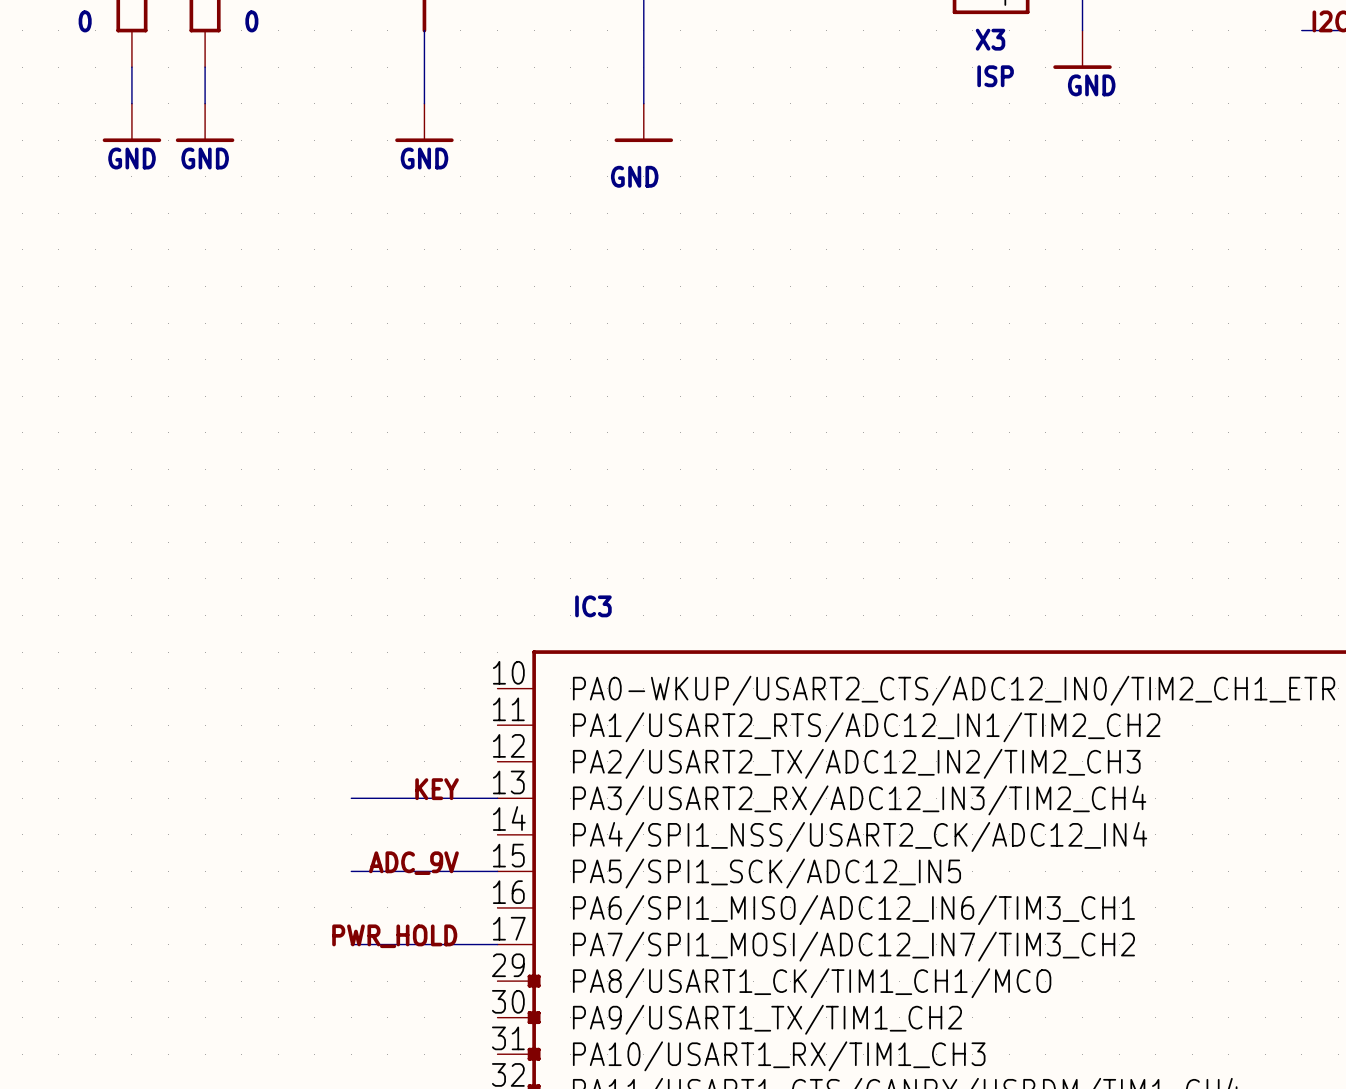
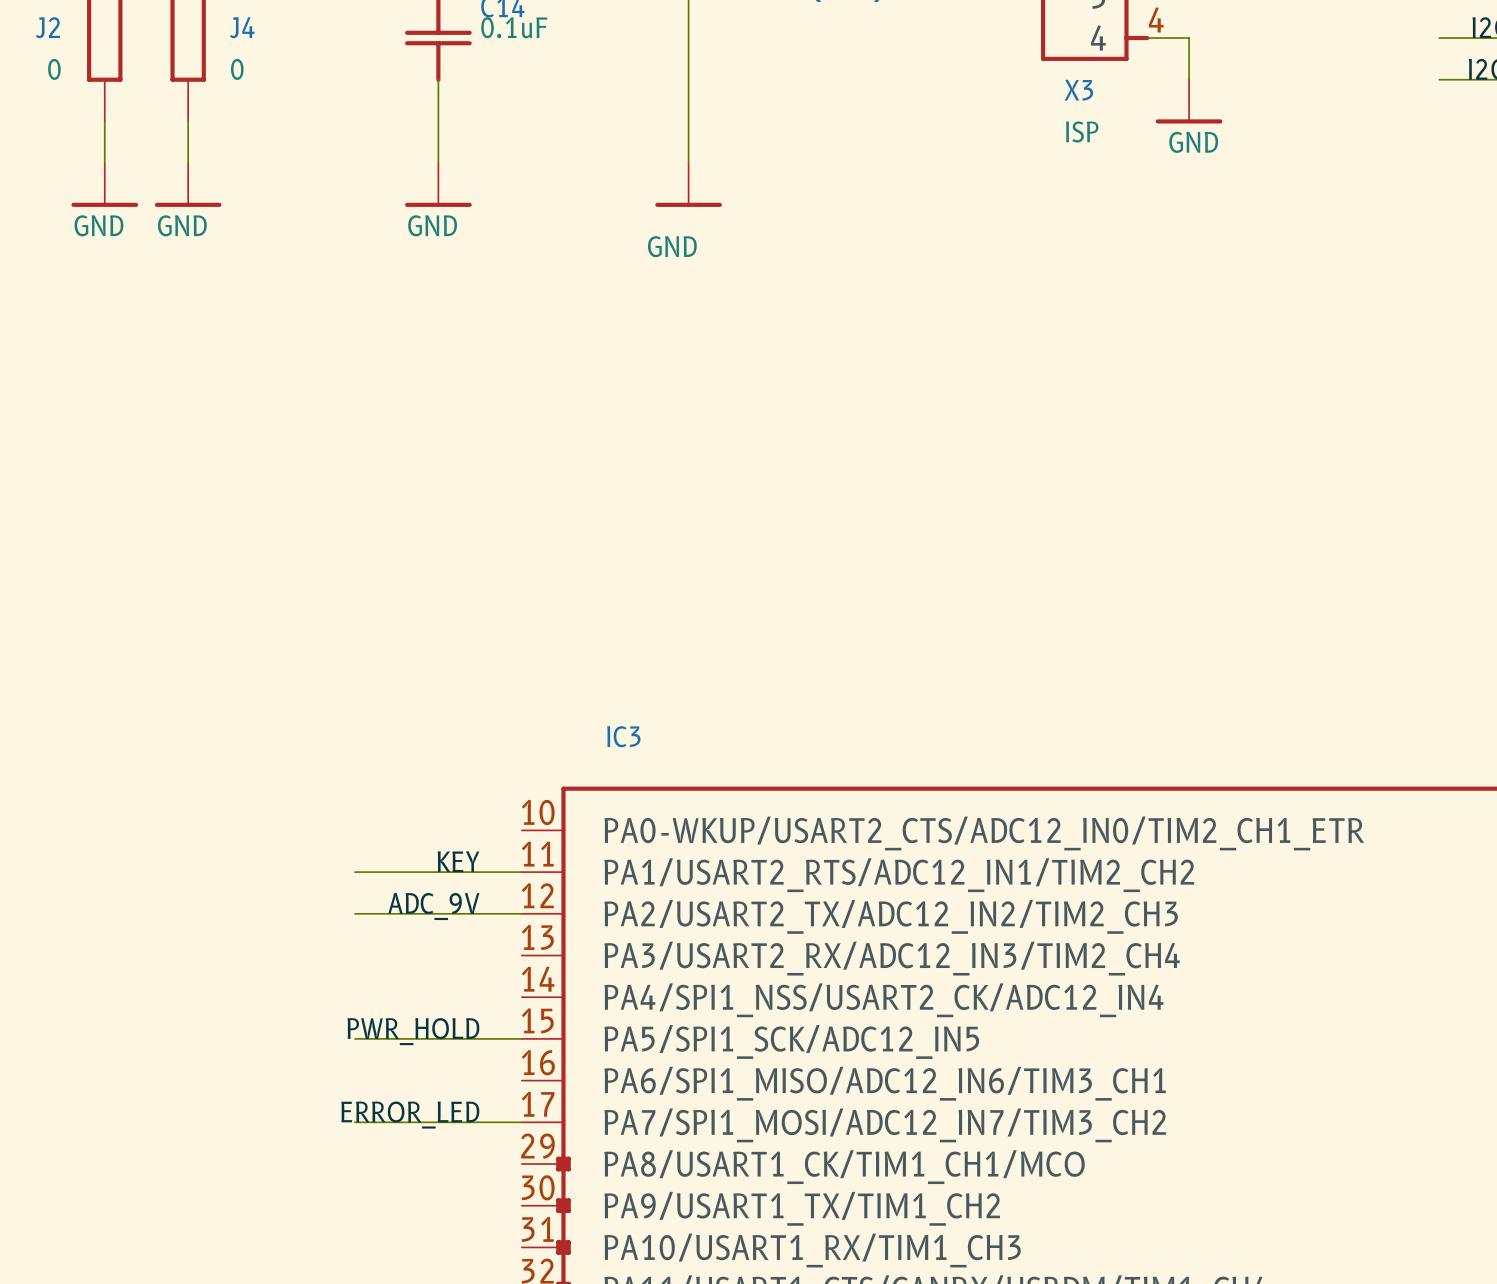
wire: none -> (354, 872) (521, 872)
label: none -> ADC_9V (433, 906)
label position: KEY (437, 789) -> KEY (458, 861)
wire: (351, 798) (497, 798) -> (354, 913) (521, 913)
label: ADC_9V (413, 863) -> PWR_HOLD (413, 1031)
label: PWR_HOLD (394, 936) -> ERROR_LED (410, 1115)

